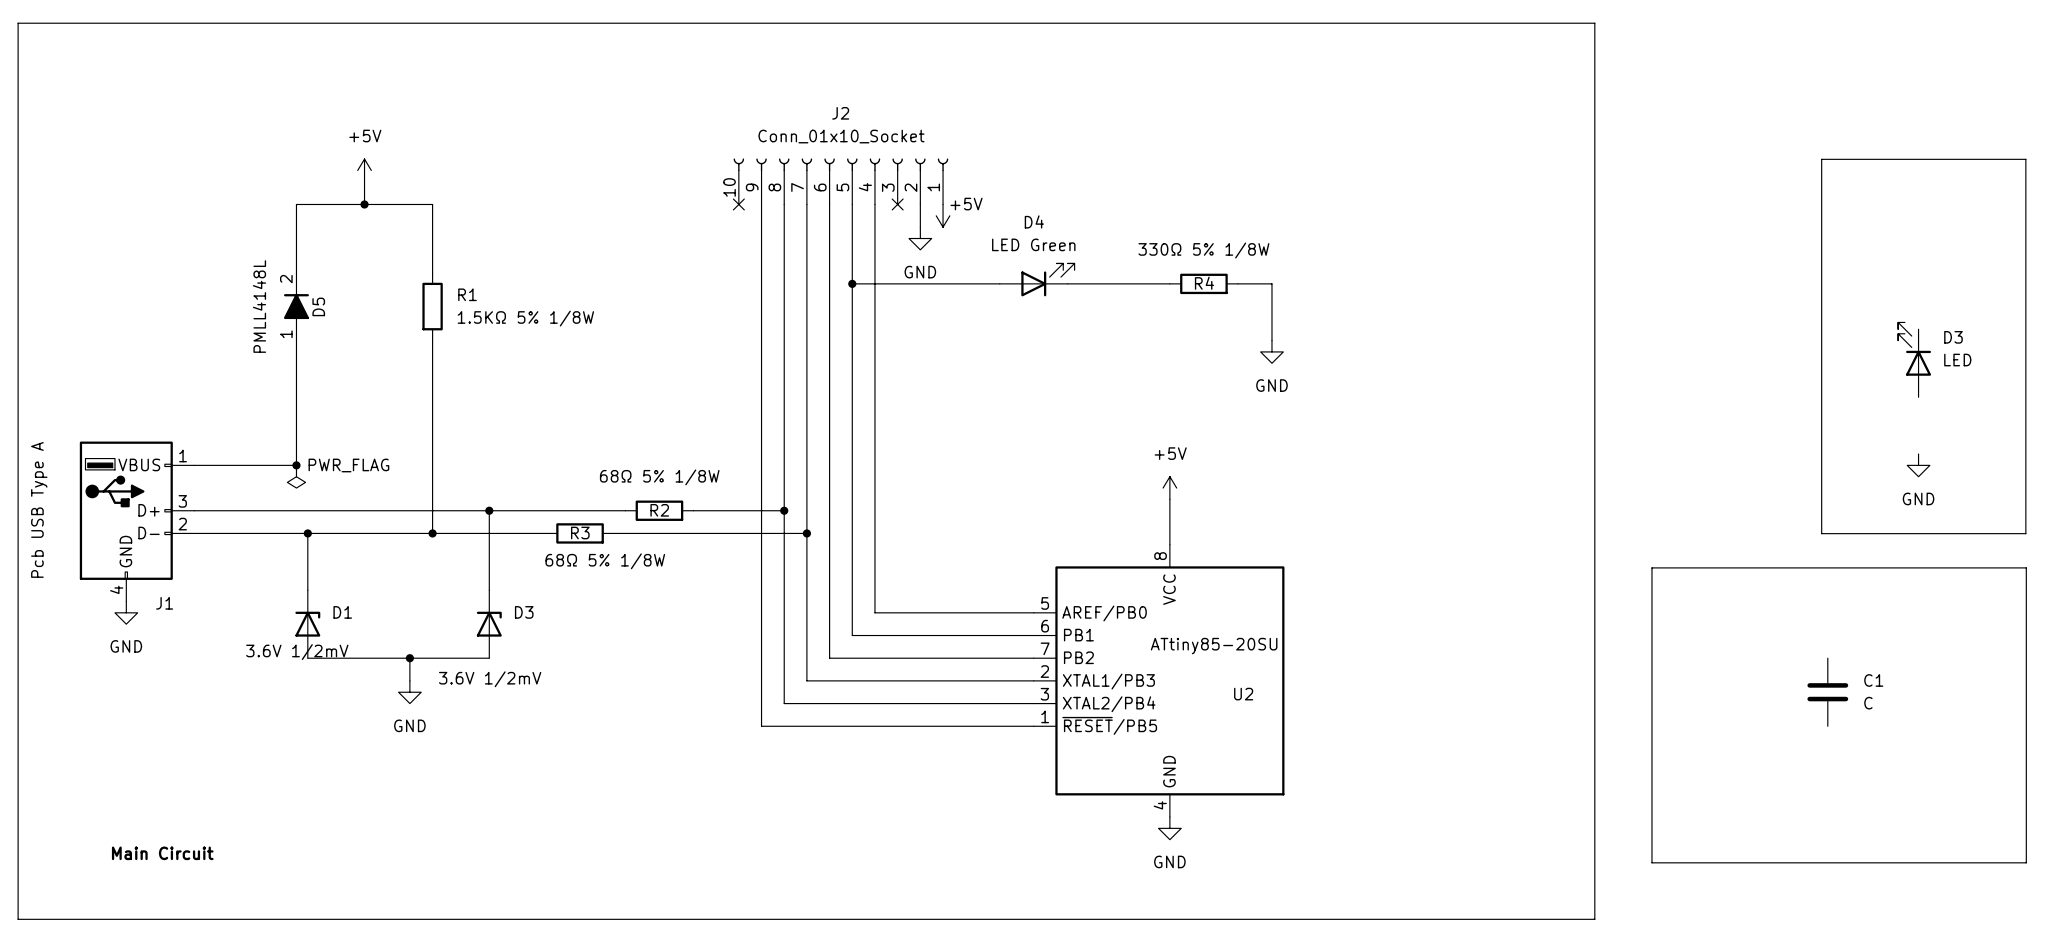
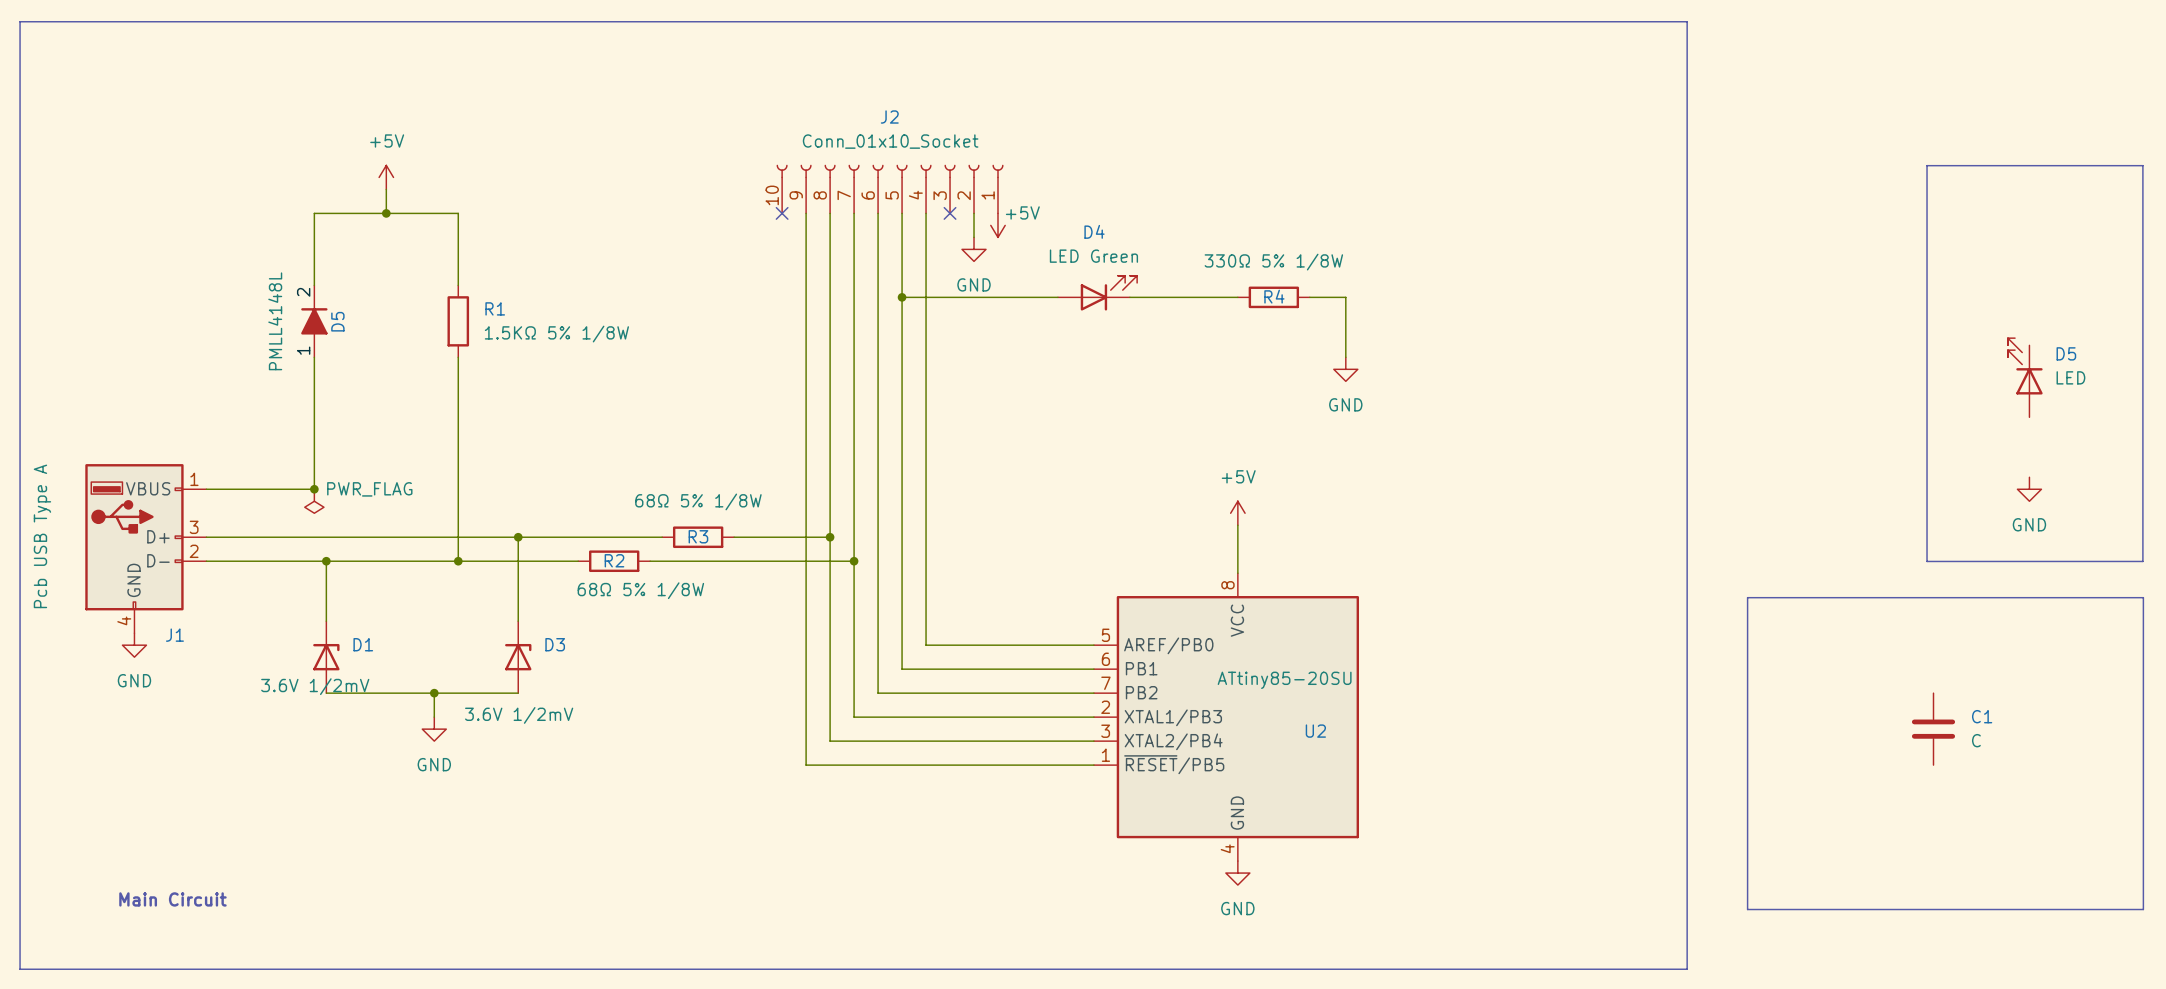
D3 name: D3 (1953, 337) -> D5 (2066, 353)
R2 name: R2 (659, 510) -> R3 (698, 536)
R3 name: R3 (580, 533) -> R2 (614, 560)

